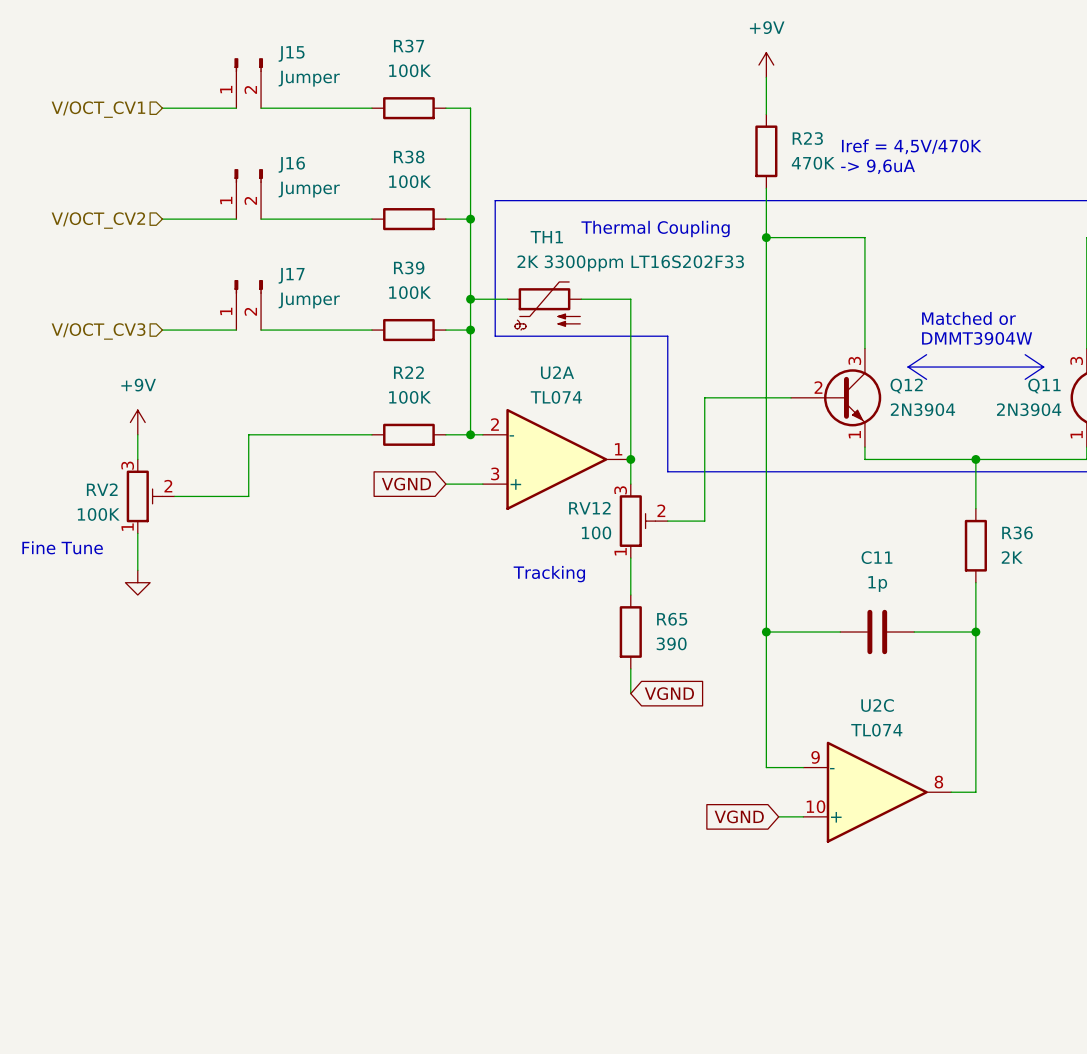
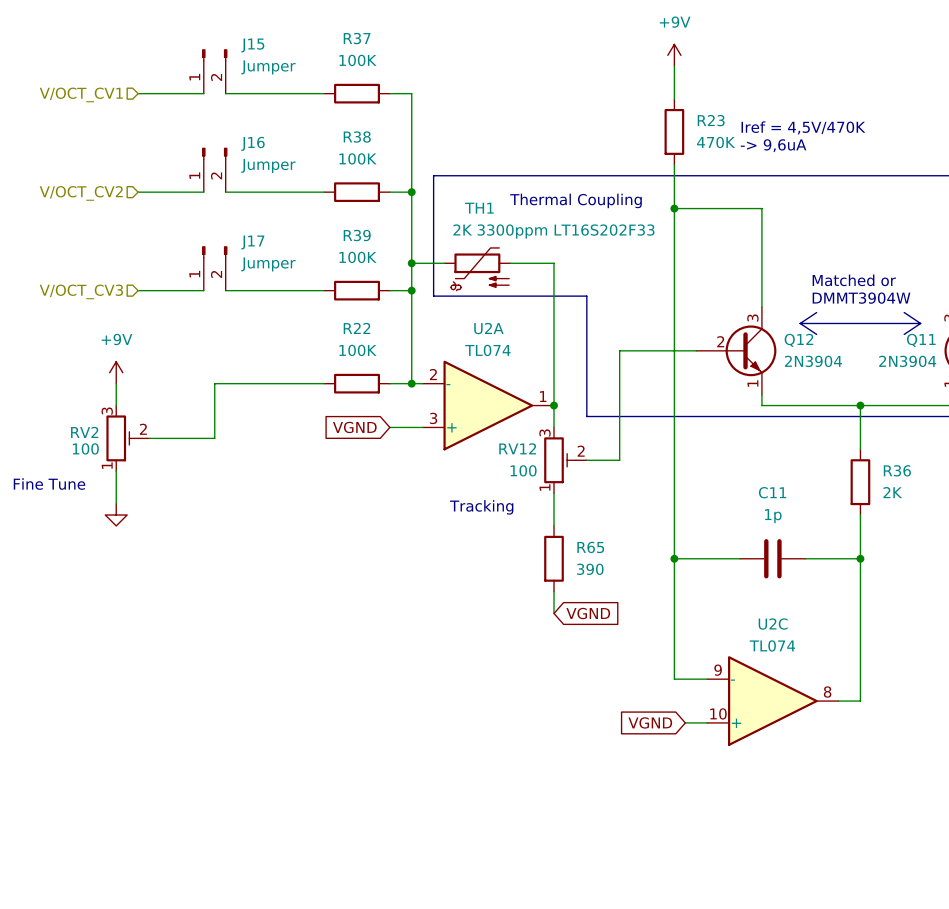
RV2 value: 100K (98, 514) -> 100 (85, 448)

